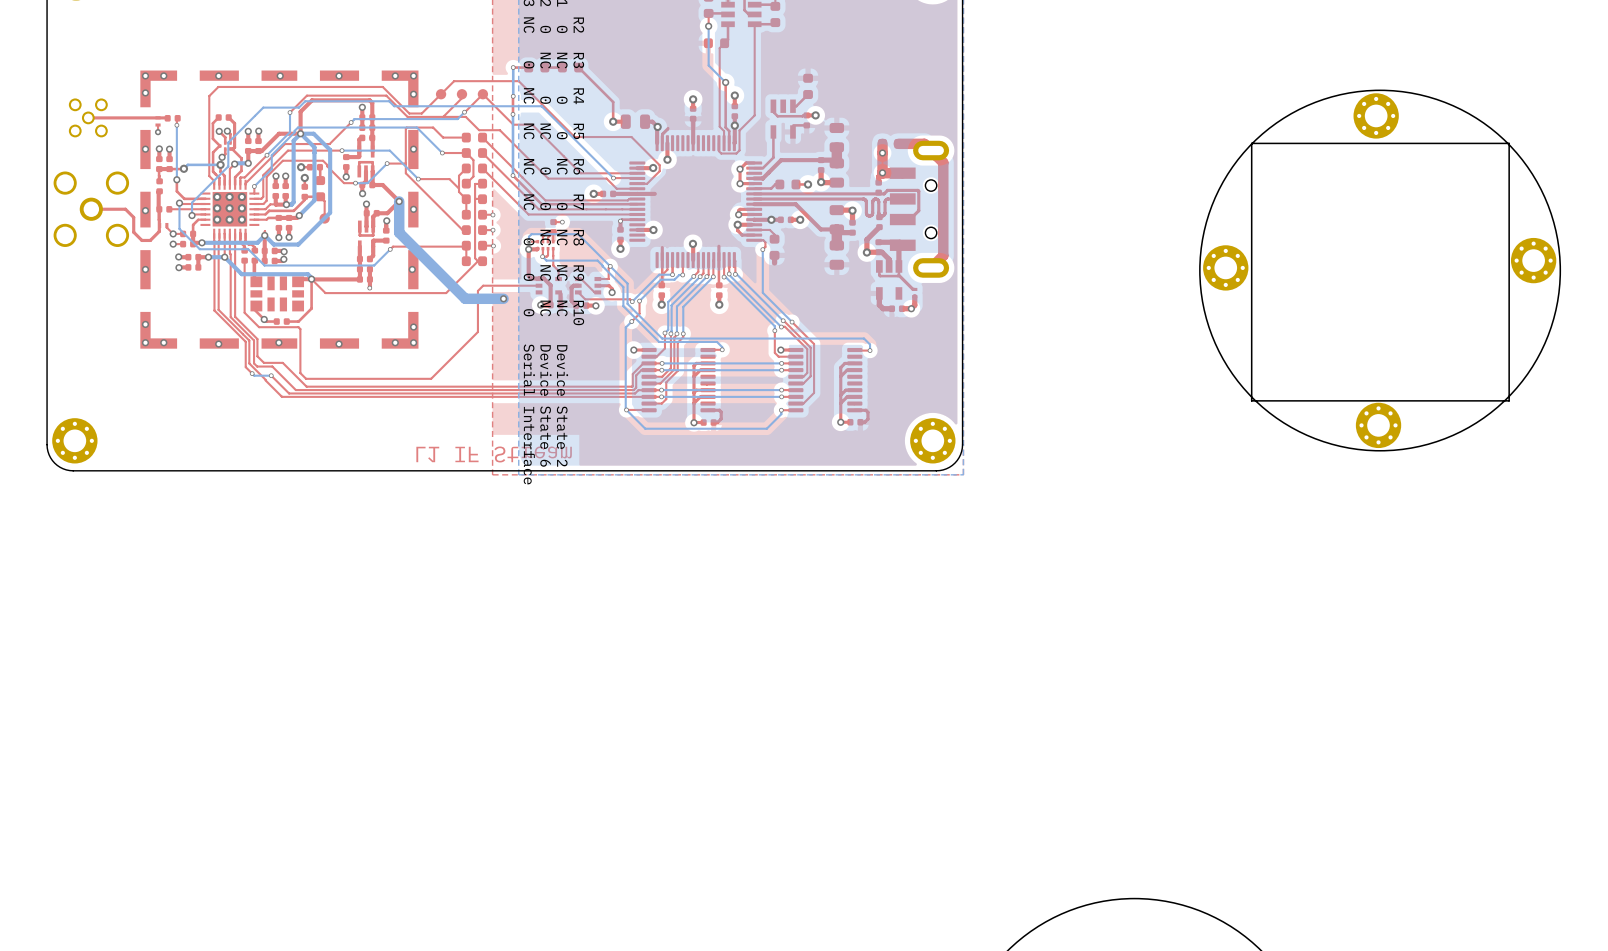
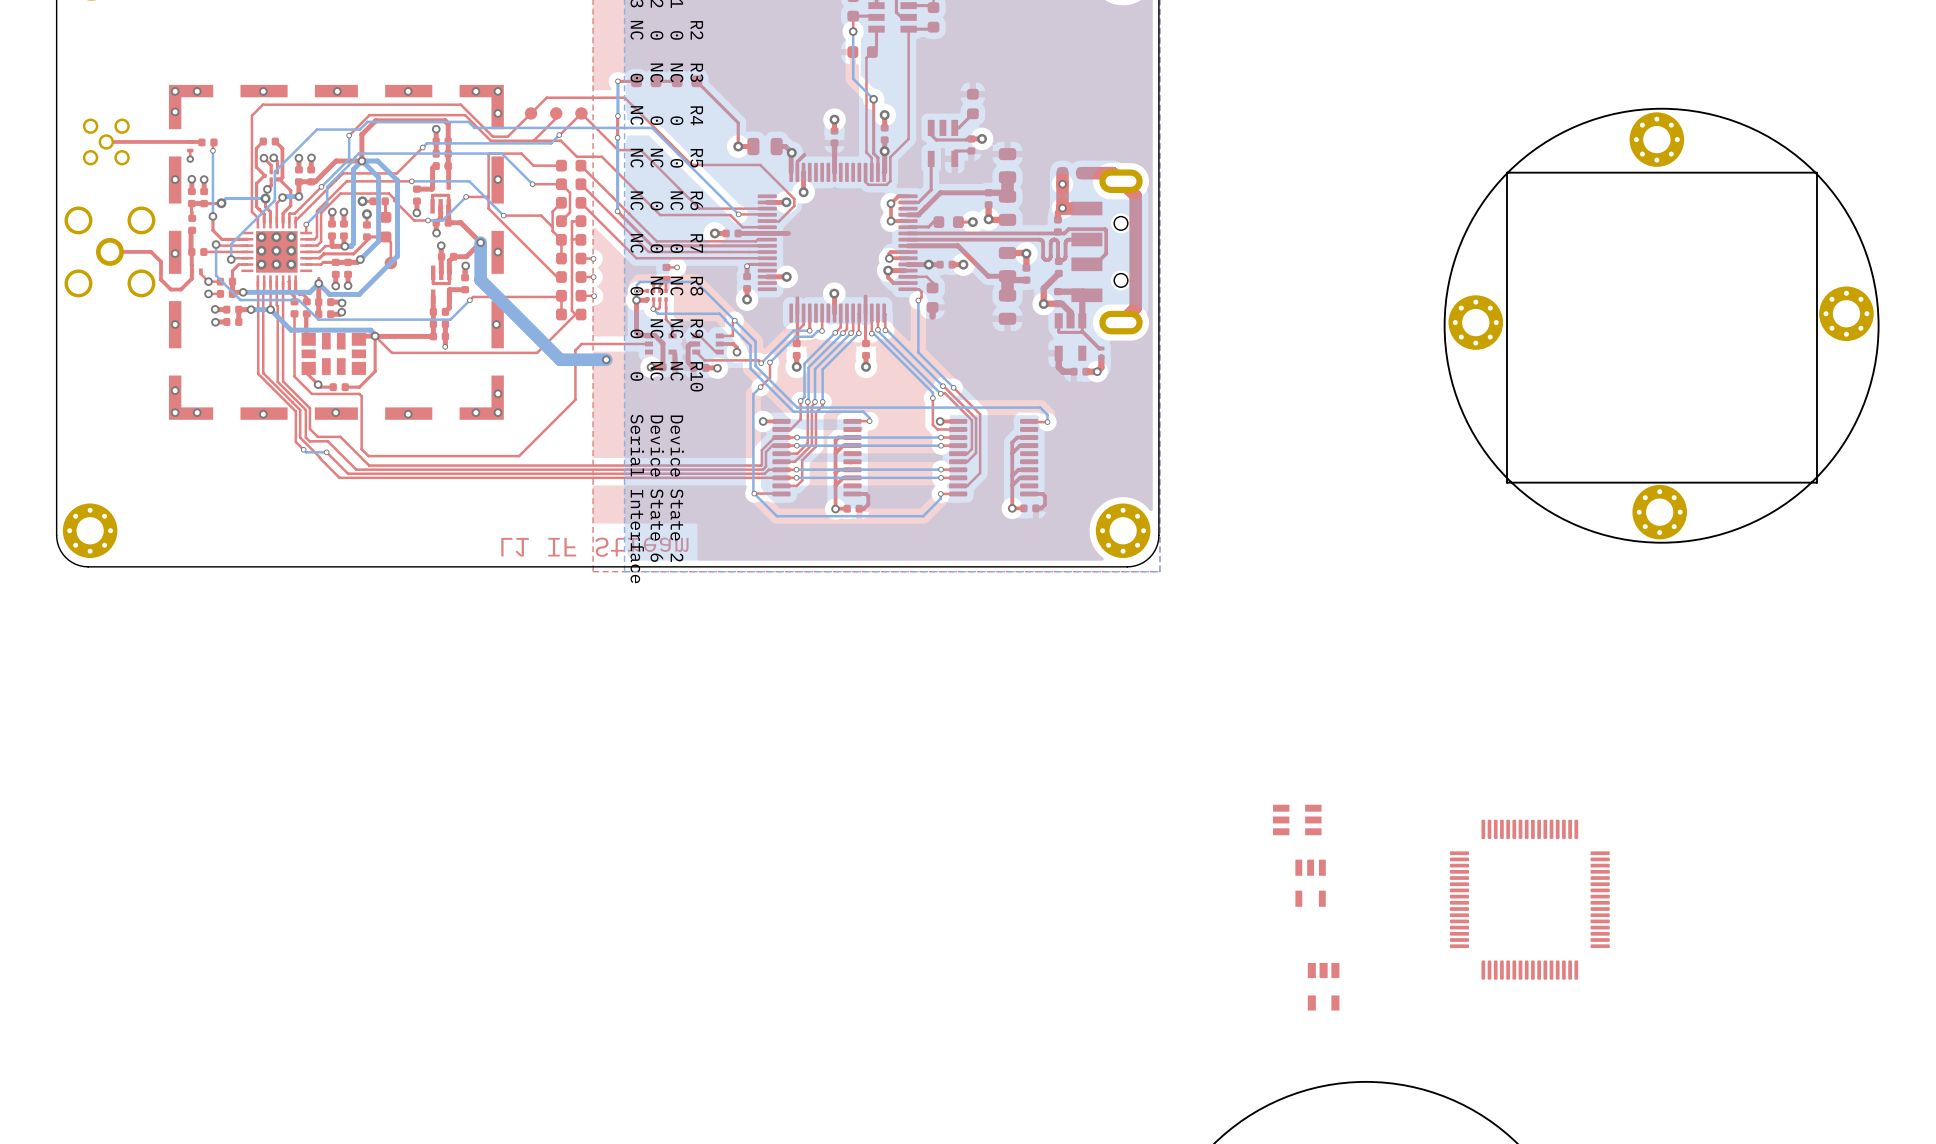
part: none -> (1297, 819)
part: none -> (1310, 883)
part: none -> (1529, 899)
part: none -> (1323, 986)

